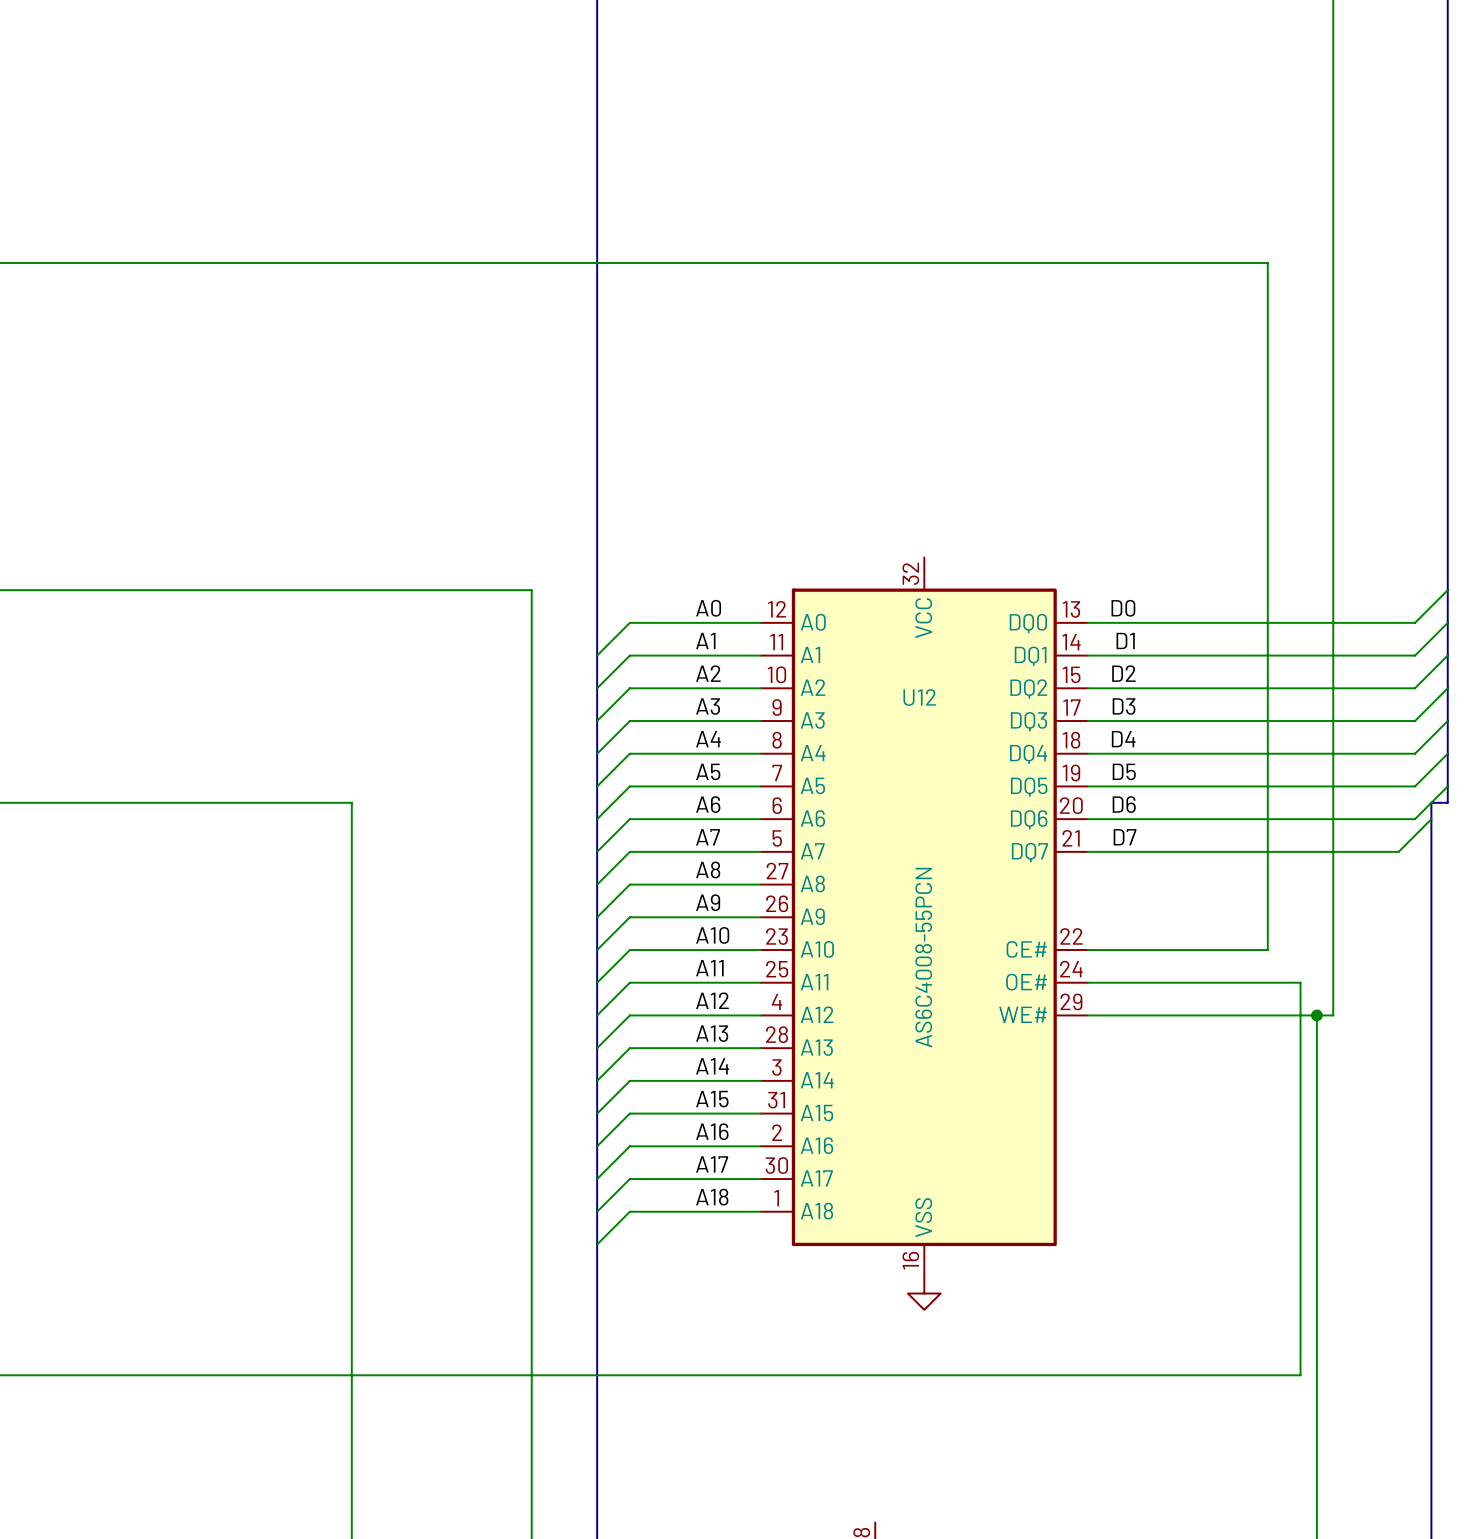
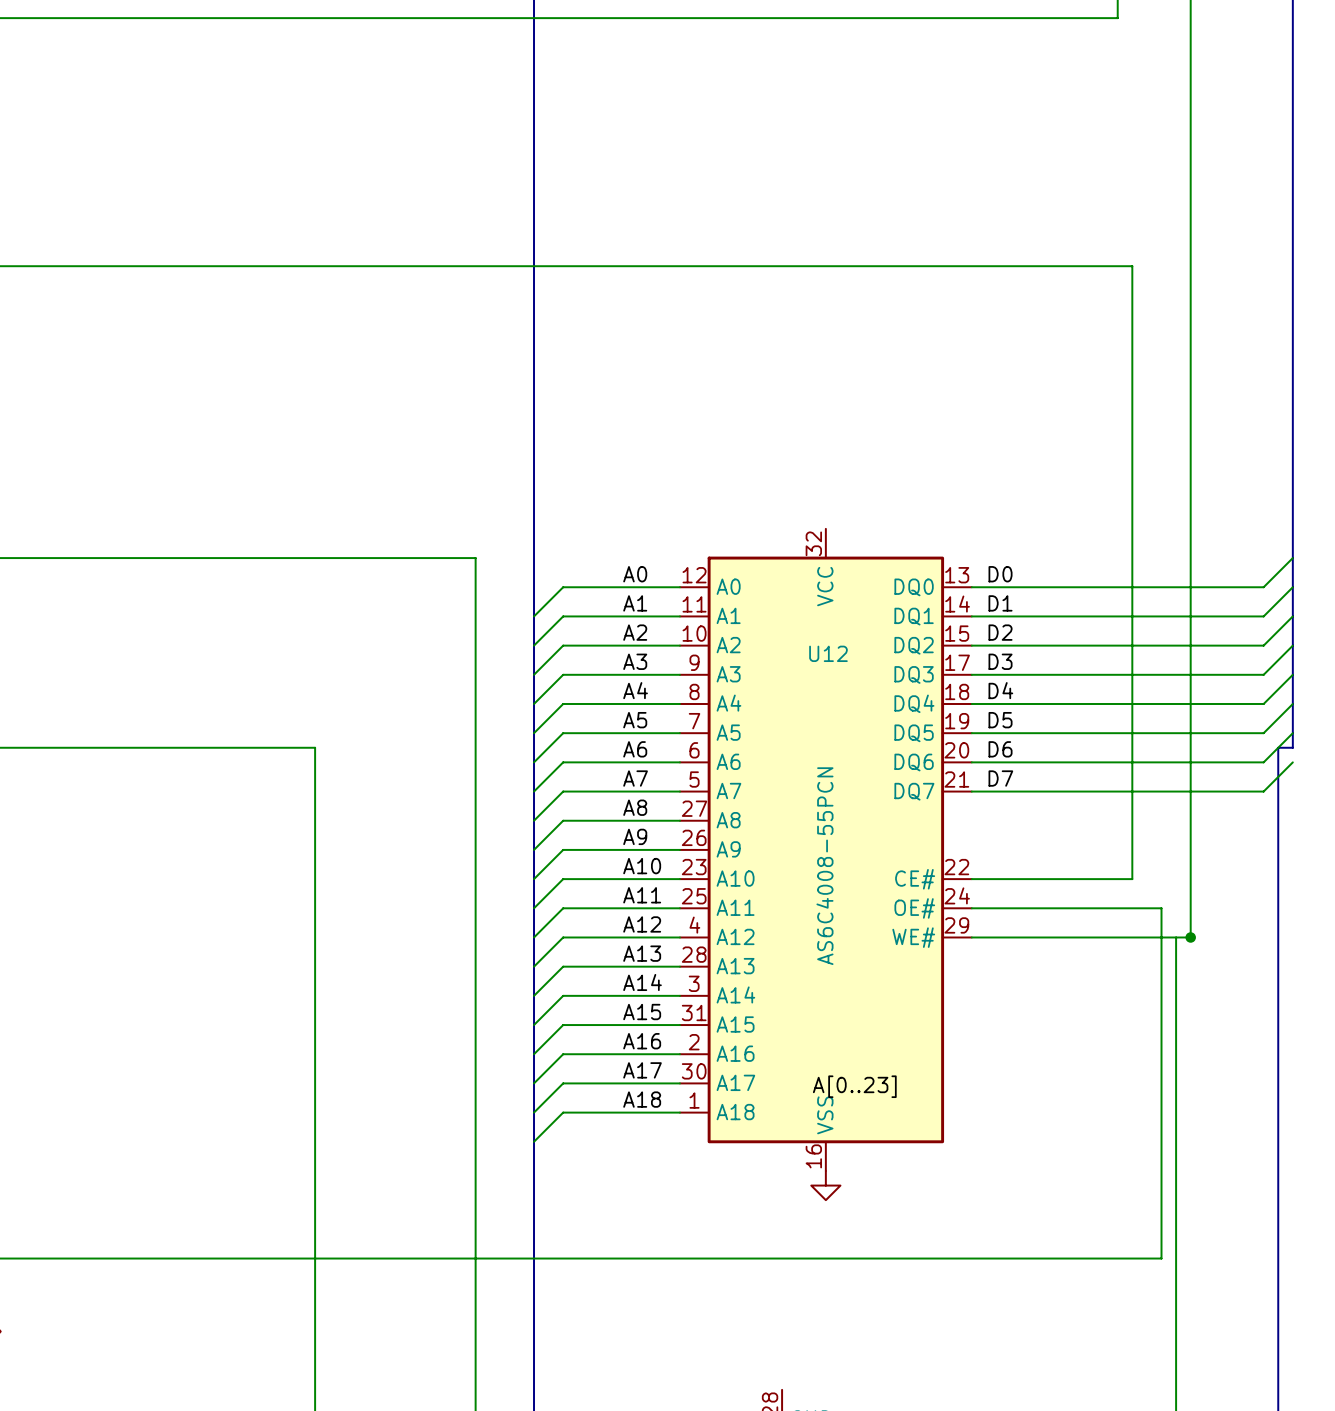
wire: (1431, 819) (1398, 851) -> (1292, 762) (1263, 791) (1249, 791)
junction position: (1316, 1015) -> (1190, 937)
label: none -> A[0..23] (854, 1086)

